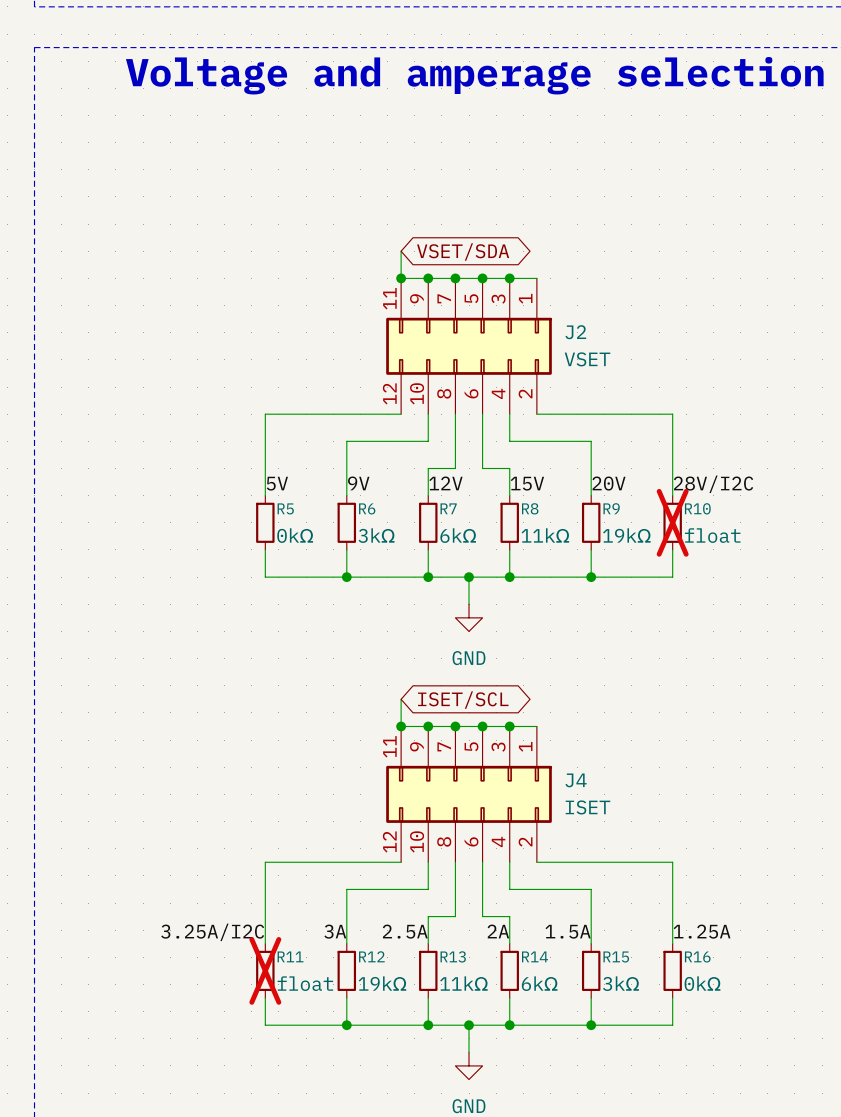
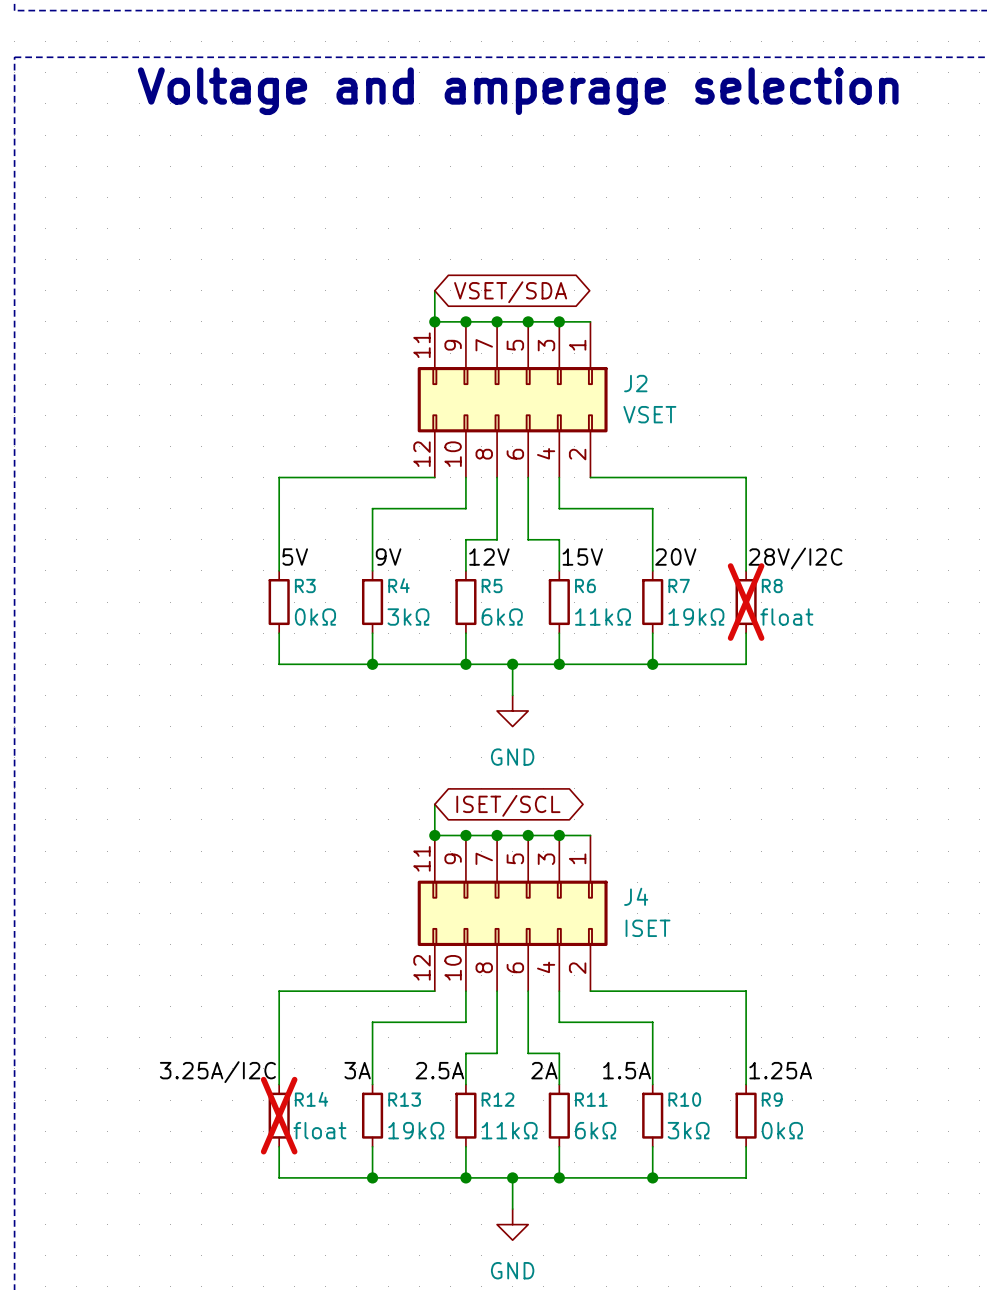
R5 name: R5 (285, 508) -> R3 (305, 586)
R6 name: R6 (367, 508) -> R4 (398, 585)
R7 name: R7 (448, 508) -> R5 (492, 586)
R8 name: R8 (530, 508) -> R6 (585, 586)
R9 name: R9 (611, 508) -> R7 (679, 586)
R10 name: R10 (697, 508) -> R8 (772, 586)
R11 name: R11 (290, 956) -> R14 (311, 1099)
R12 name: R12 (371, 956) -> R13 (404, 1099)
R13 name: R13 (453, 956) -> R12 (498, 1099)
R14 name: R14 (535, 956) -> R11 (591, 1099)
R15 name: R15 (616, 957) -> R10 (684, 1099)
R16 name: R16 (697, 957) -> R9 (772, 1099)

